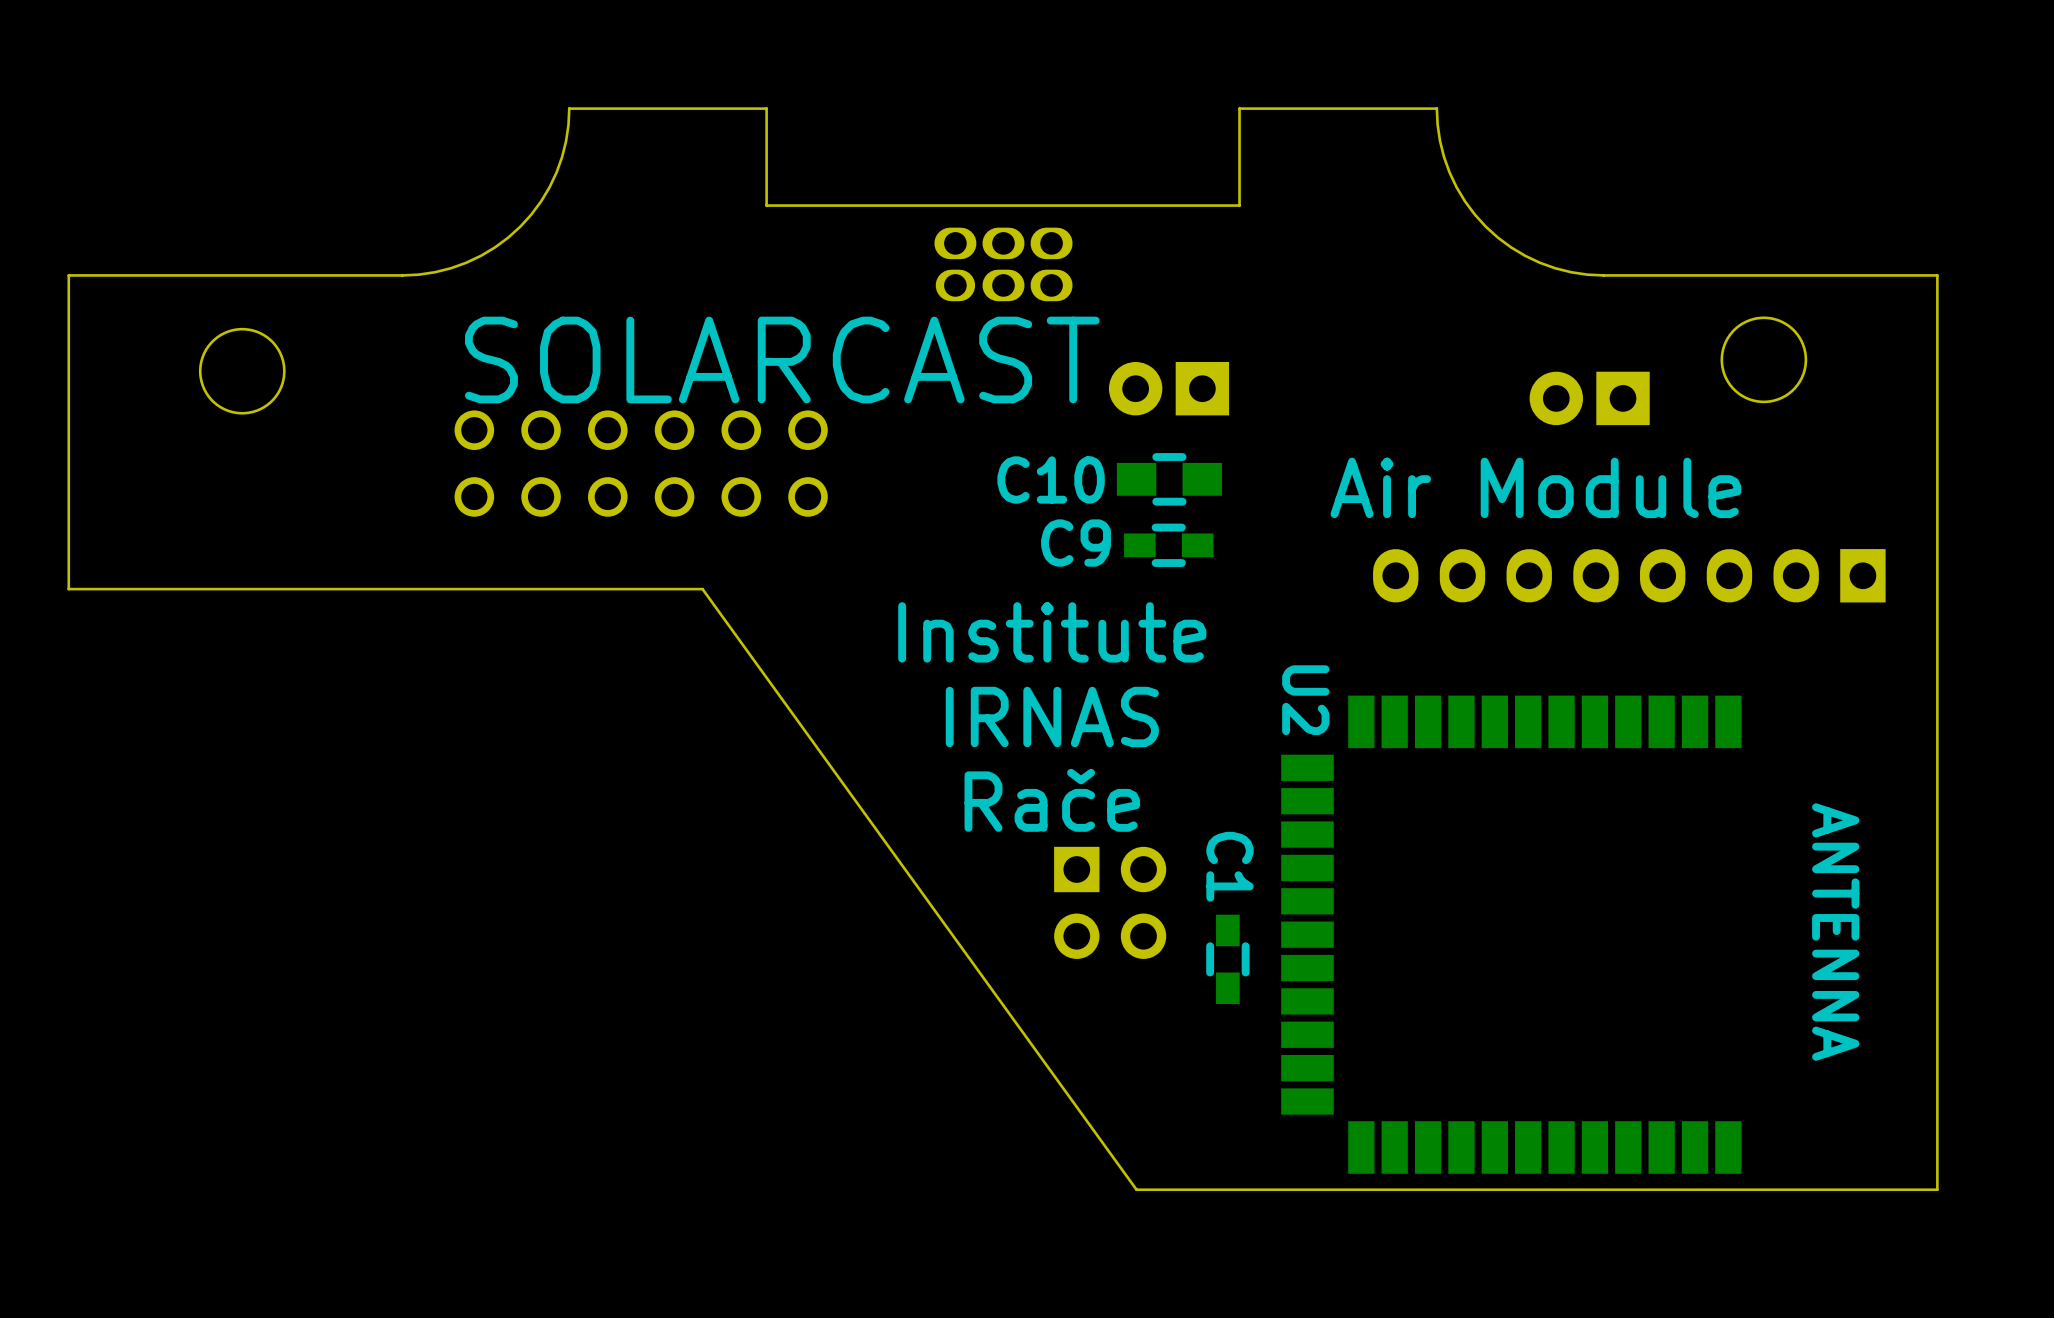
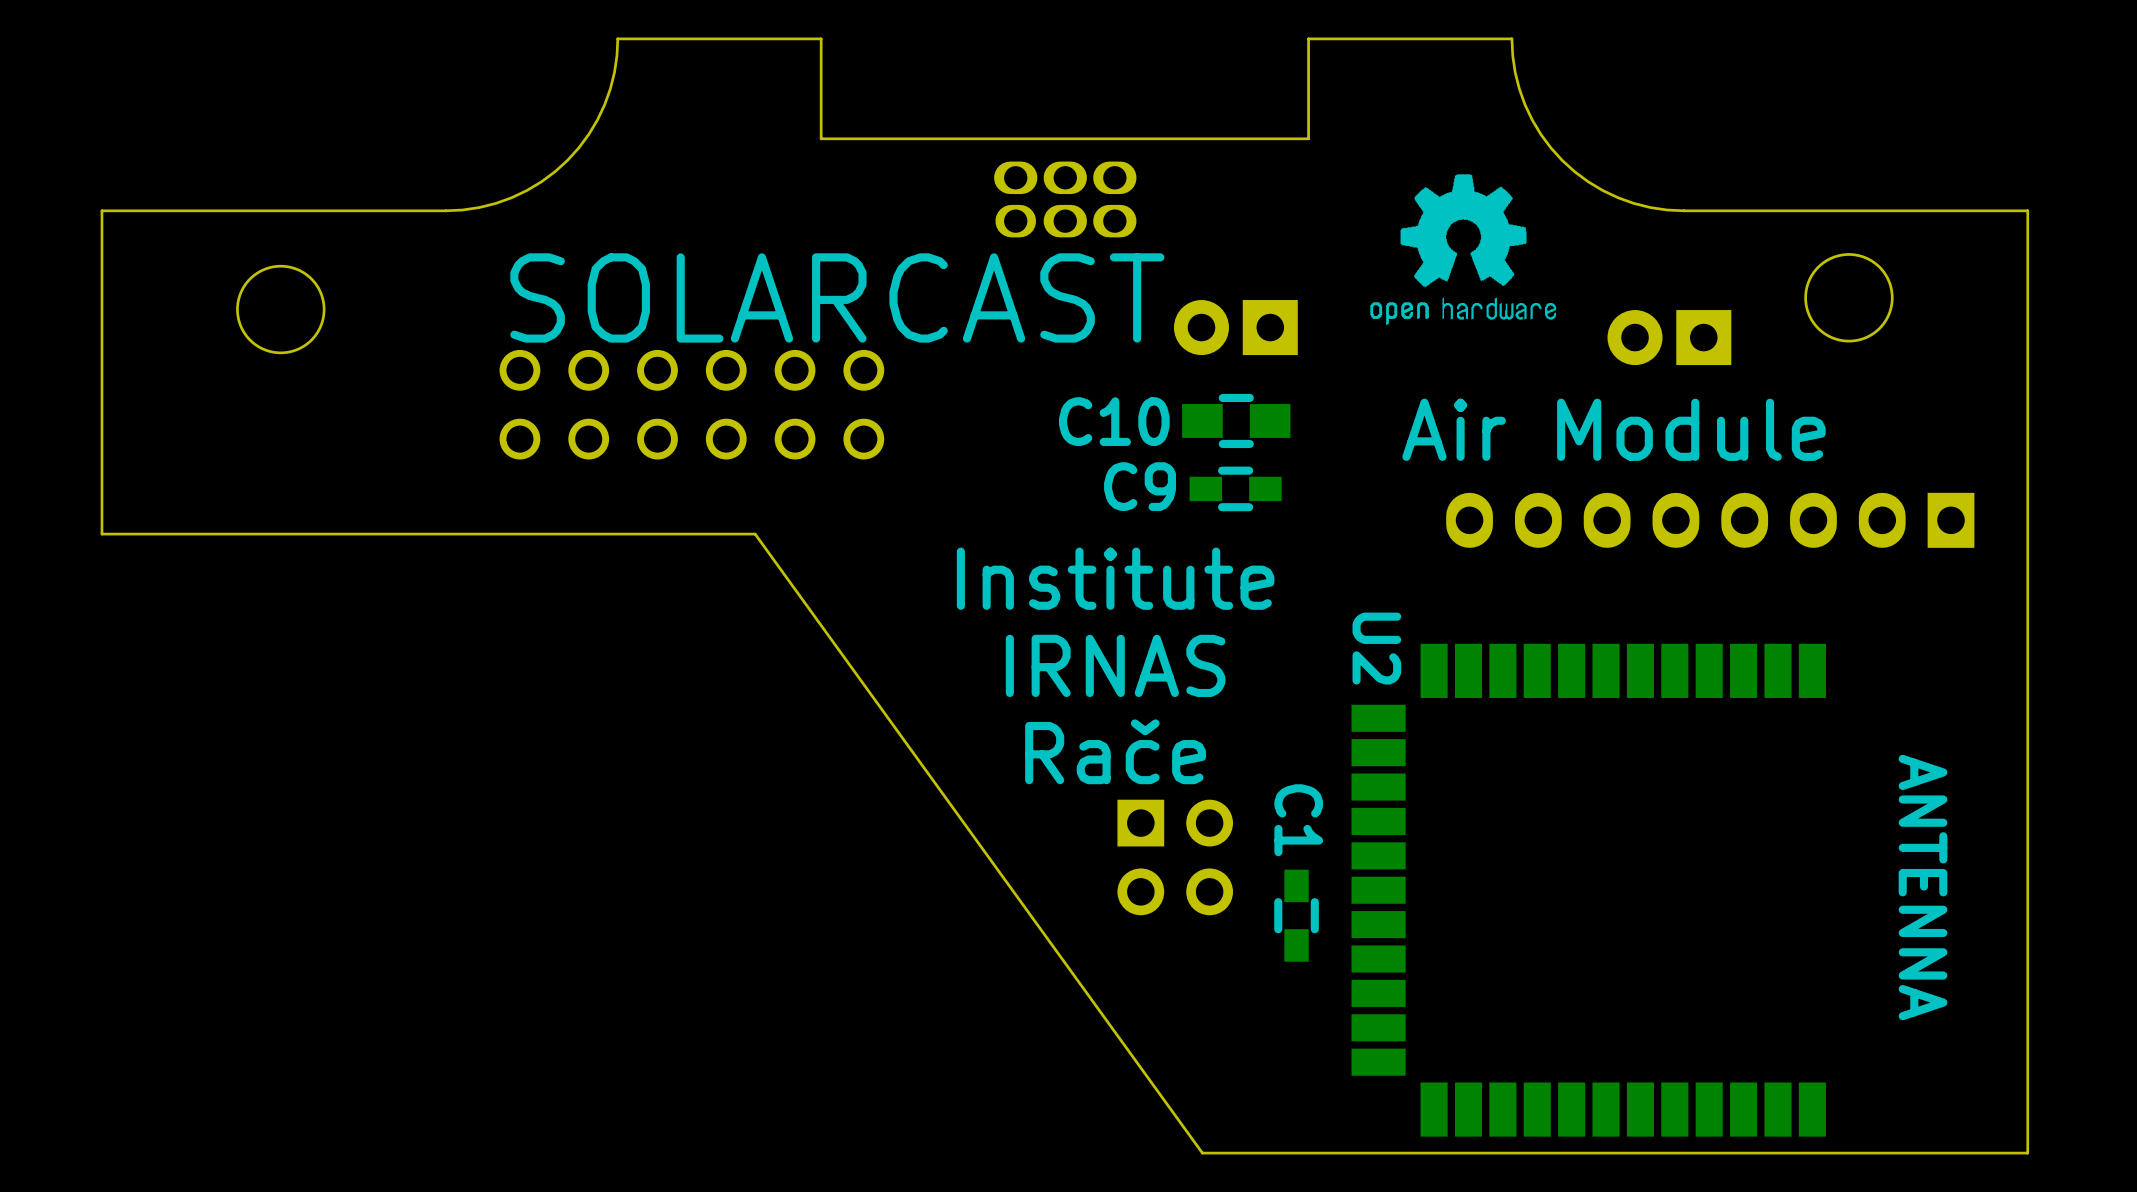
drawing: none -> [1370, 174, 1557, 326]

